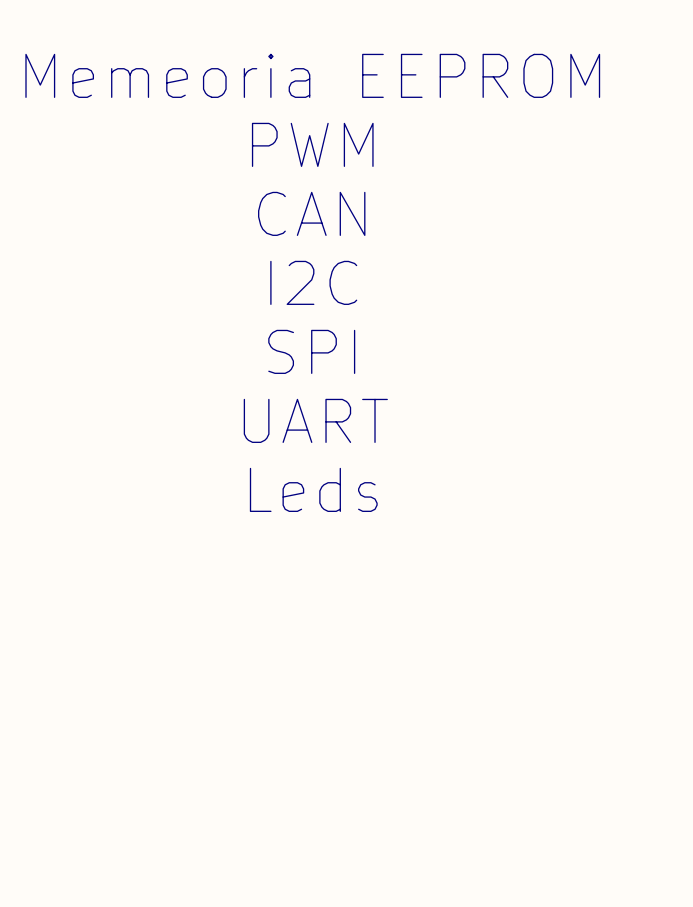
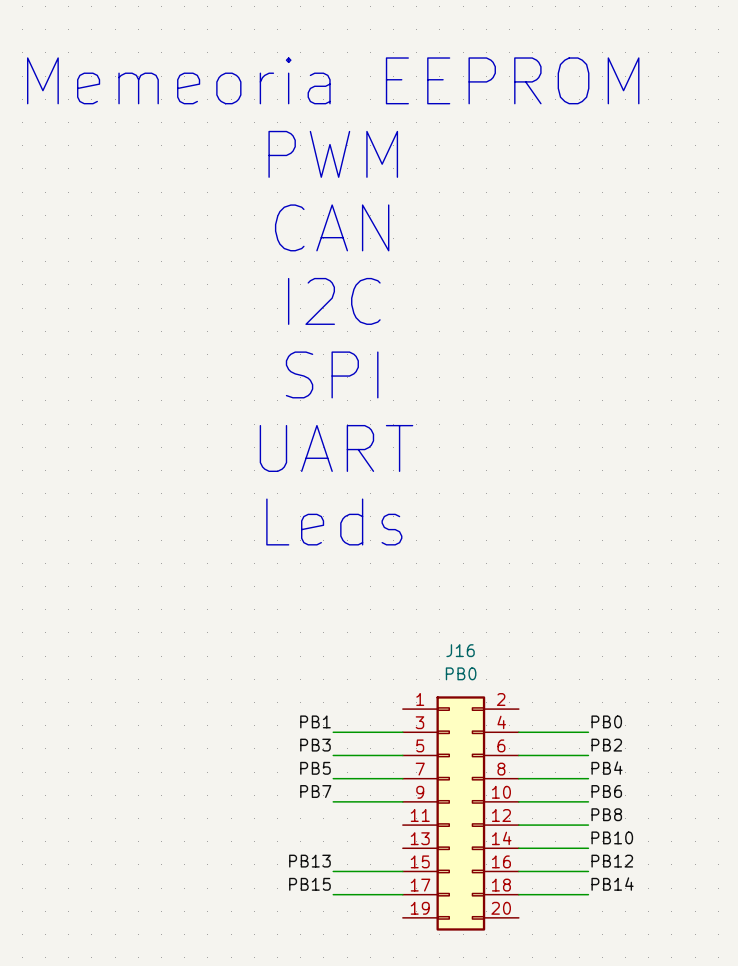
label: none -> PB1 (315, 721)
label: none -> PB0 (606, 721)
wire: none -> (333, 732) (402, 732)
wire: none -> (518, 732) (588, 732)
label: none -> PB3 (315, 745)
label: none -> PB2 (606, 745)
wire: none -> (333, 755) (402, 755)
wire: none -> (518, 755) (588, 755)
label: none -> PB4 (607, 768)
label: none -> PB5 (315, 768)
wire: none -> (333, 778) (402, 778)
wire: none -> (518, 778) (588, 778)
label: none -> PB7 (315, 791)
label: none -> PB6 (606, 791)
wire: none -> (333, 801) (402, 801)
wire: none -> (518, 801) (588, 801)
J16: none -> PB0 (460, 813)
label: none -> PB8 (606, 814)
wire: none -> (518, 825) (588, 825)
label: none -> PB10 (612, 837)
wire: none -> (518, 848) (588, 848)
label: none -> PB13 (309, 861)
label: none -> PB12 (612, 861)
wire: none -> (333, 871) (402, 871)
wire: none -> (518, 871) (588, 871)
label: none -> PB15 (309, 884)
label: none -> PB14 (612, 884)
wire: none -> (333, 894) (402, 894)
wire: none -> (518, 894) (588, 894)

